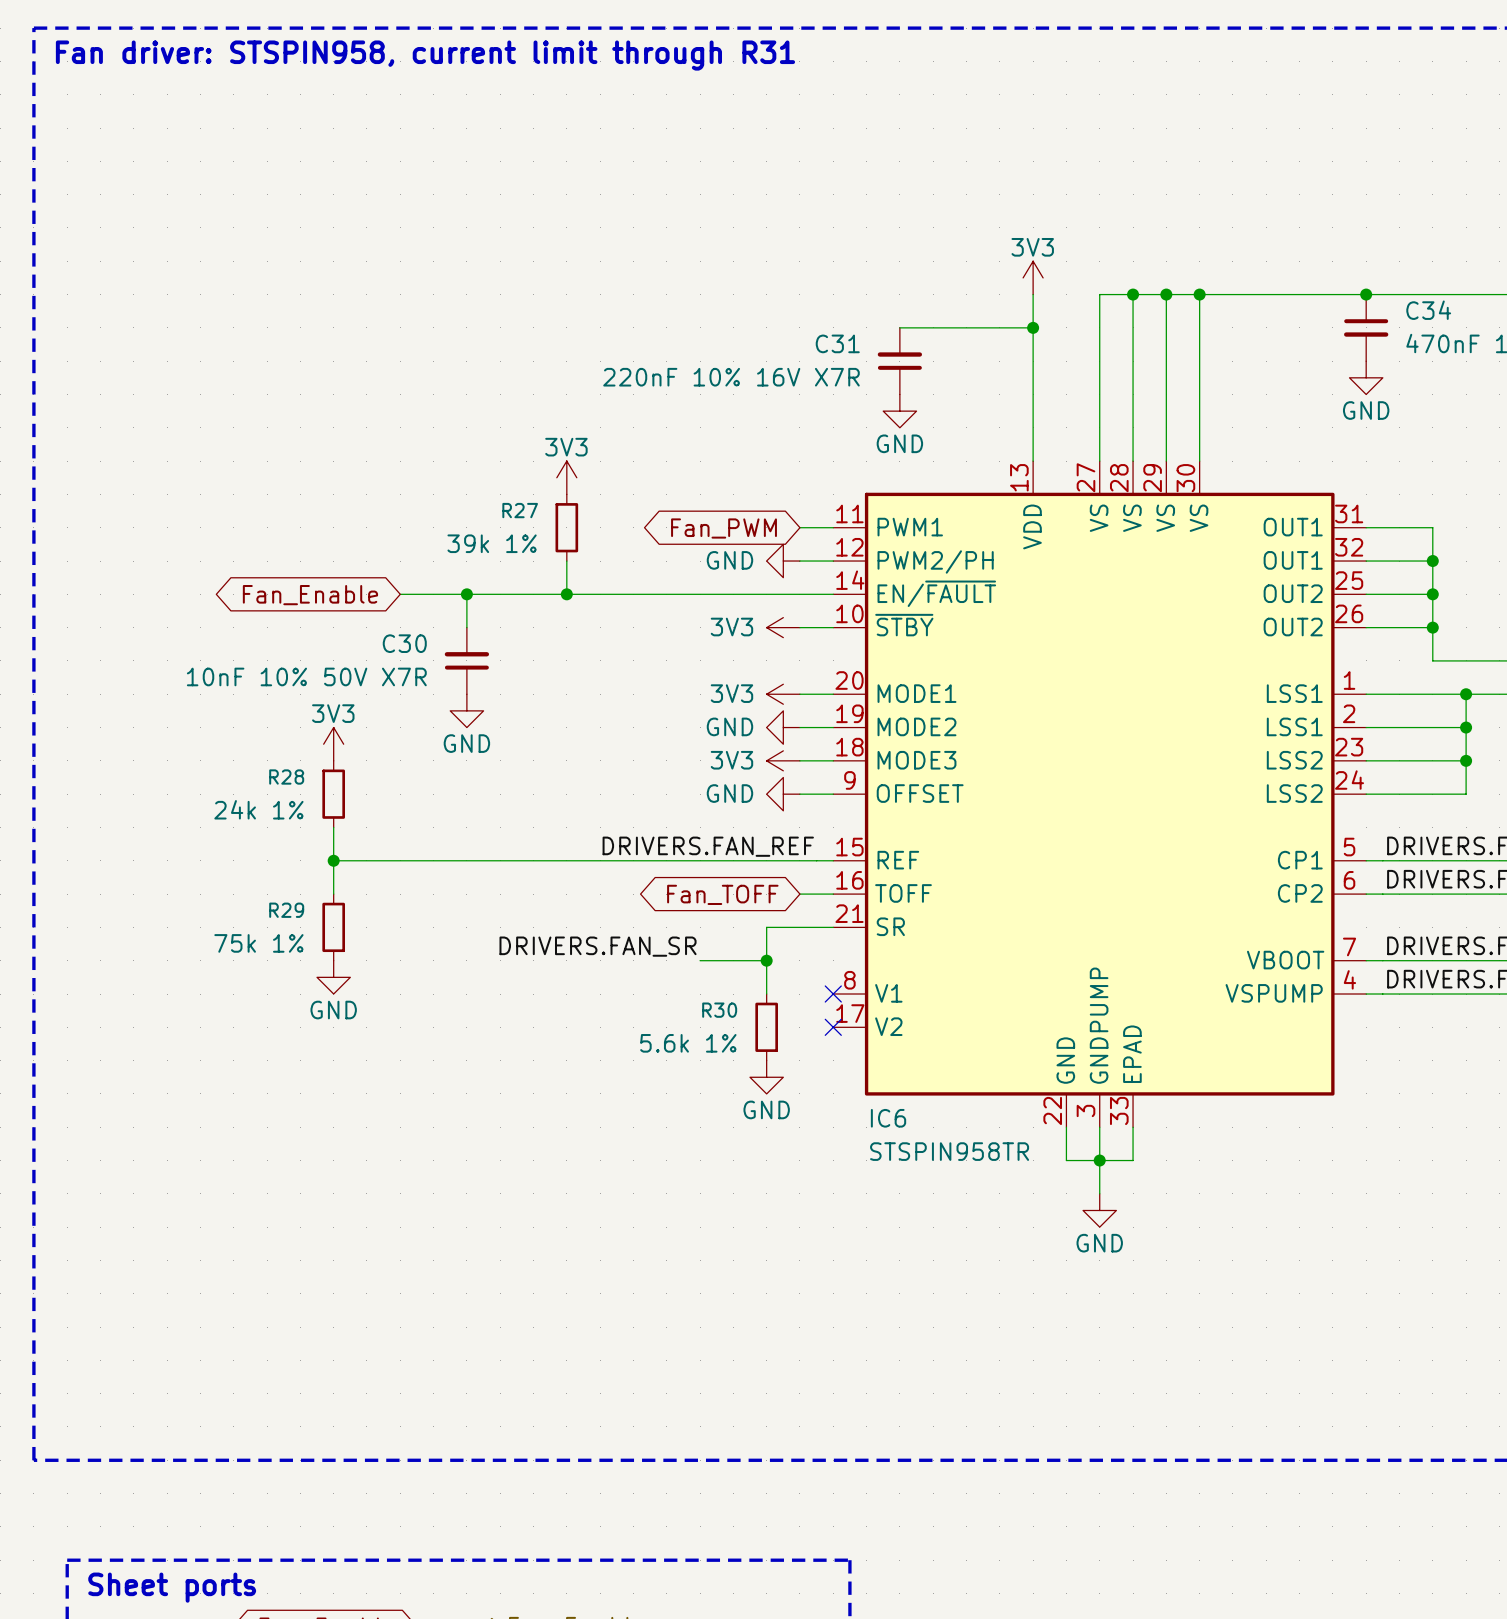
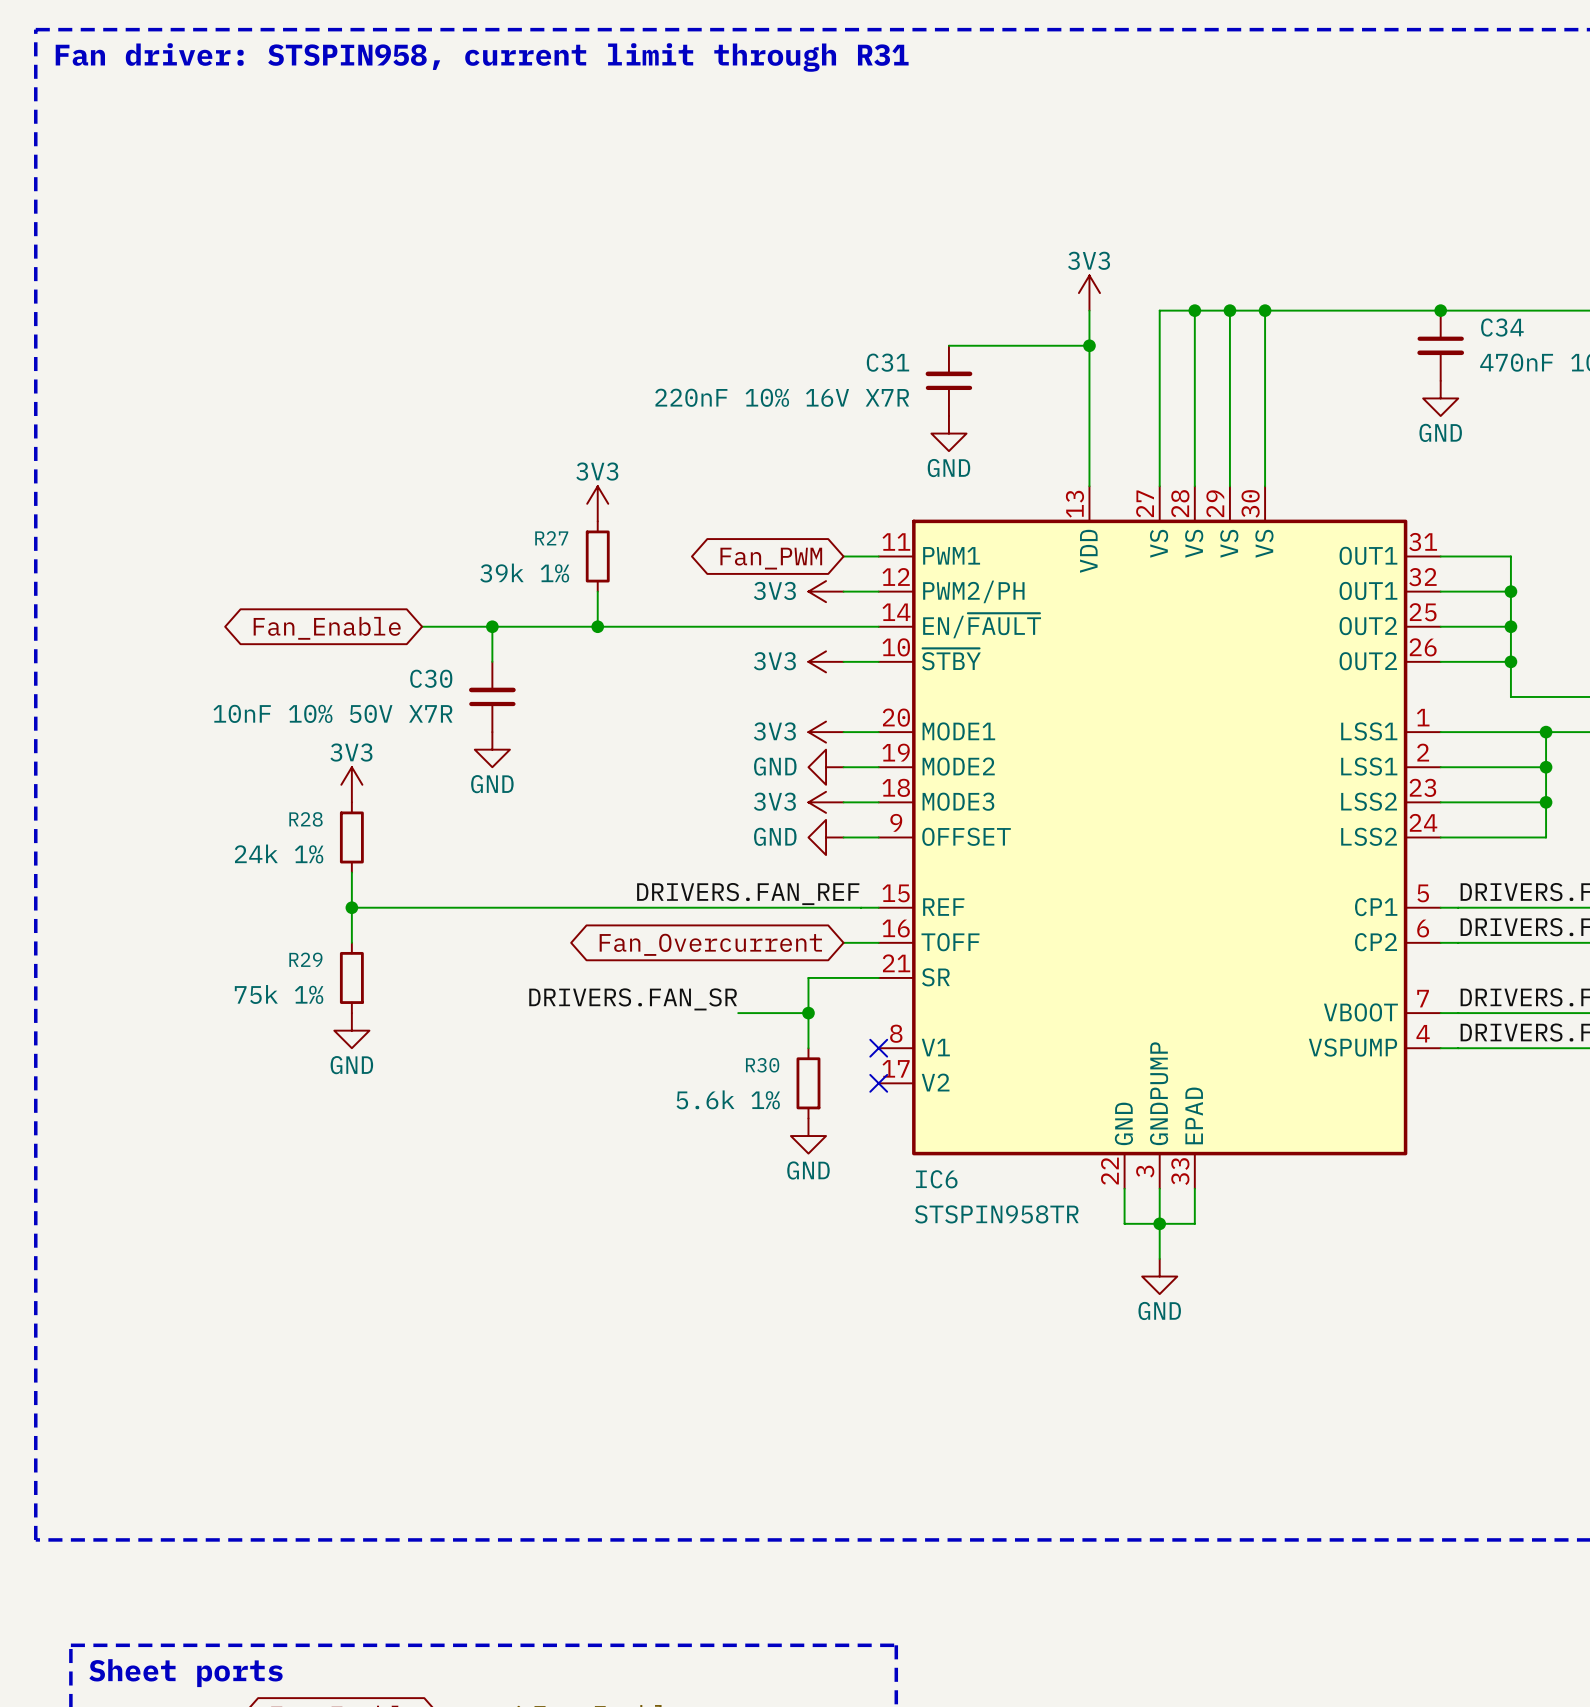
power symbol: GND (783, 561) -> 3V3 (826, 591)
global label: Fan_TOFF (722, 894) -> Fan_Overcurrent (710, 944)

